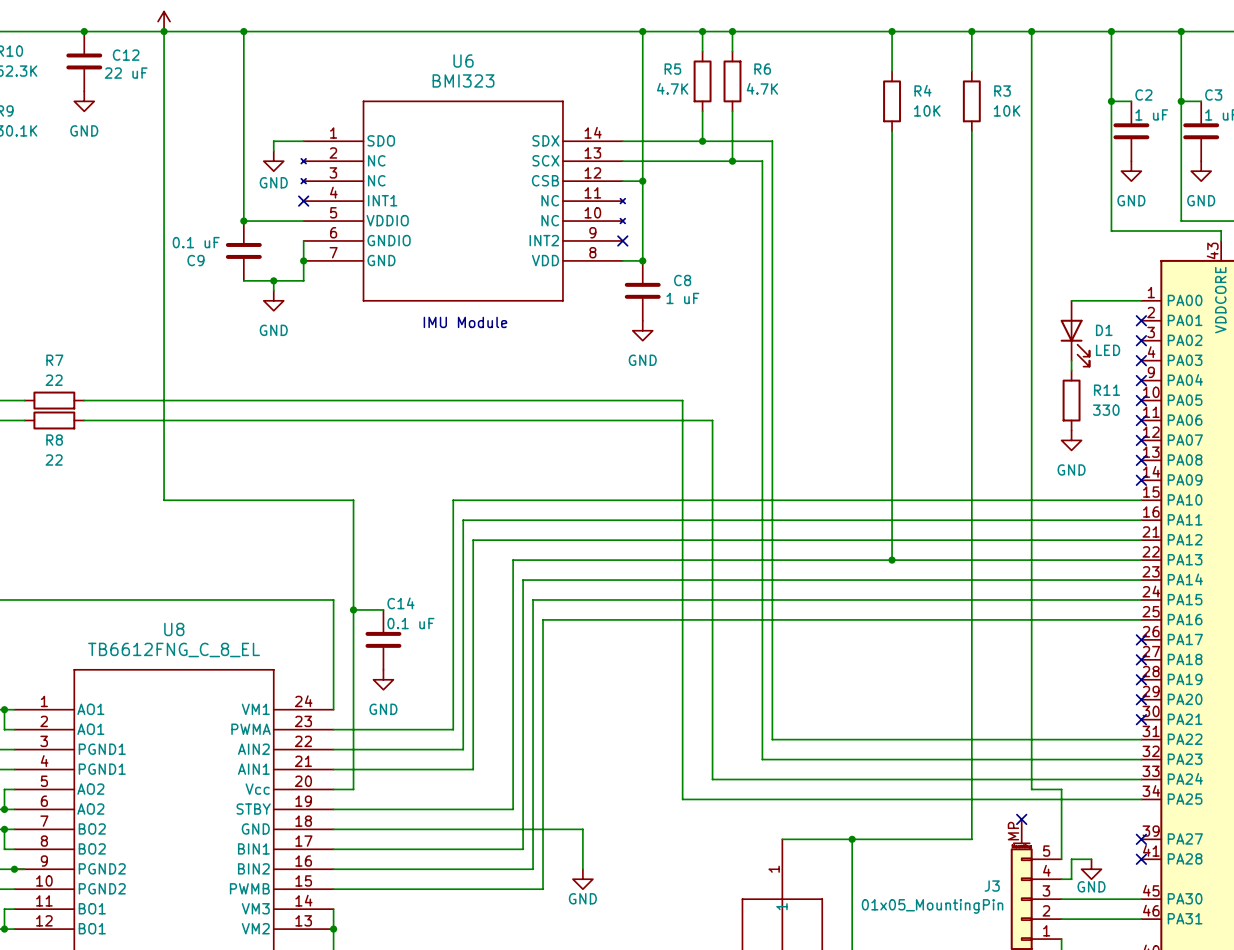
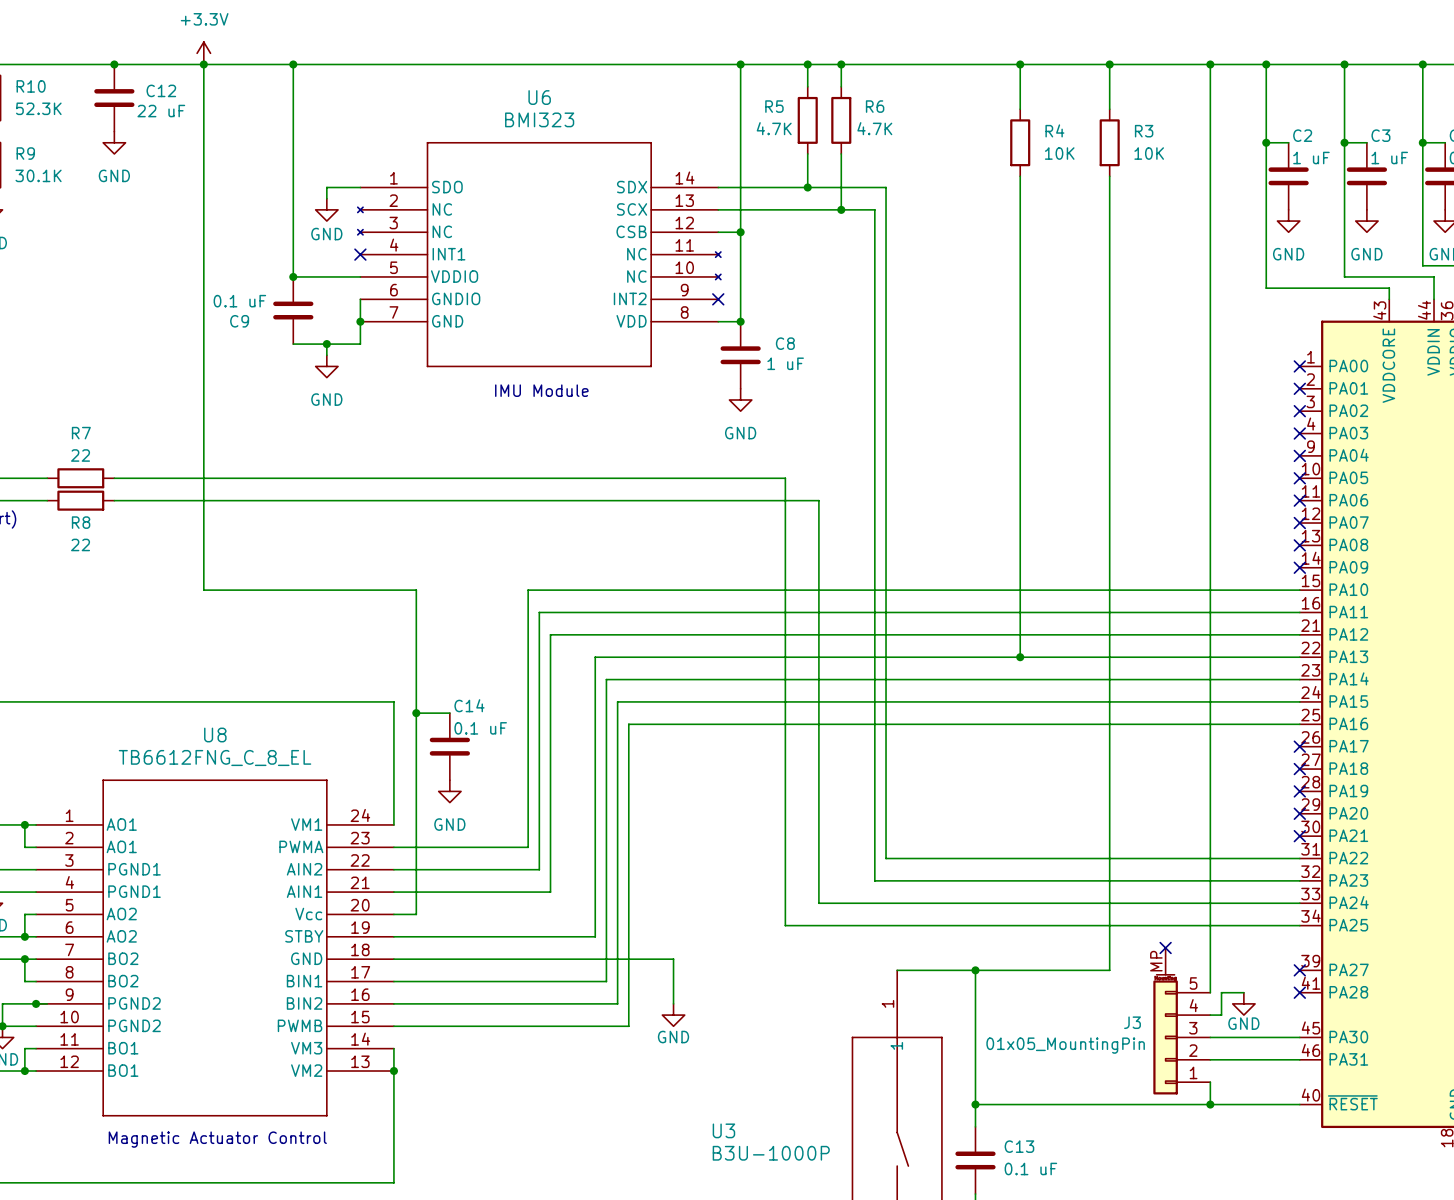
wire: (1031, 31) (1031, 789) (1061, 789) -> (1210, 64) (1210, 914)
junction position: (1031, 31) -> (1210, 64)
wire: (1071, 300) (1141, 300) -> none
no-connect mark: none -> (1299, 366)
D1: LED (1075, 333) -> none
wire: (1071, 360) (1071, 370) -> none
R11: 330 (1071, 400) -> none
power symbol: GND (1071, 440) -> none

